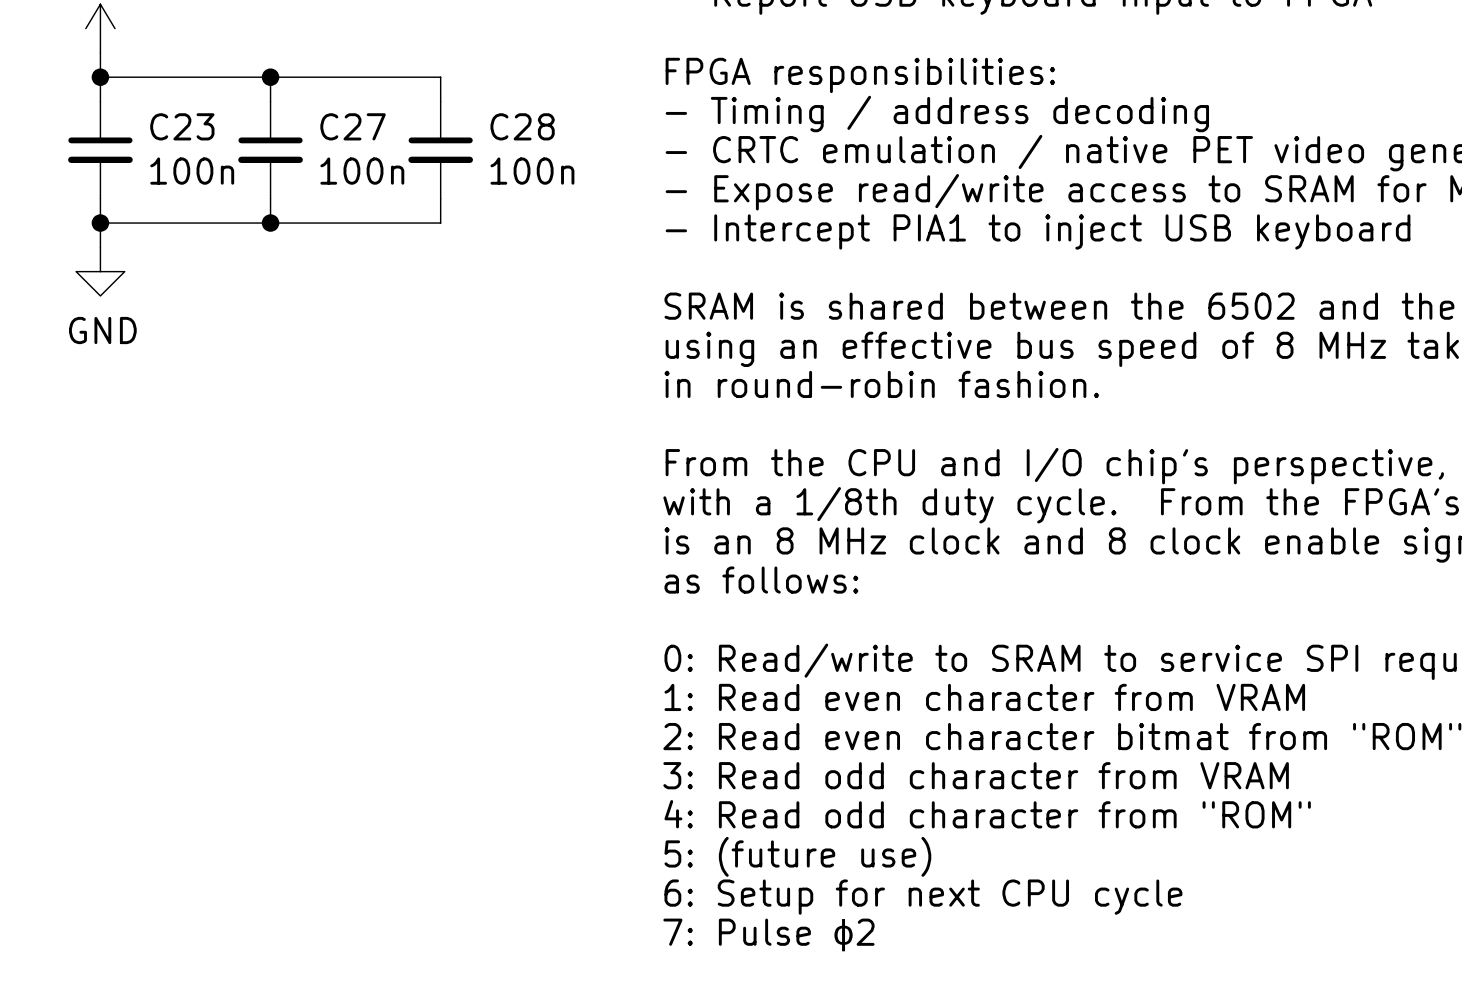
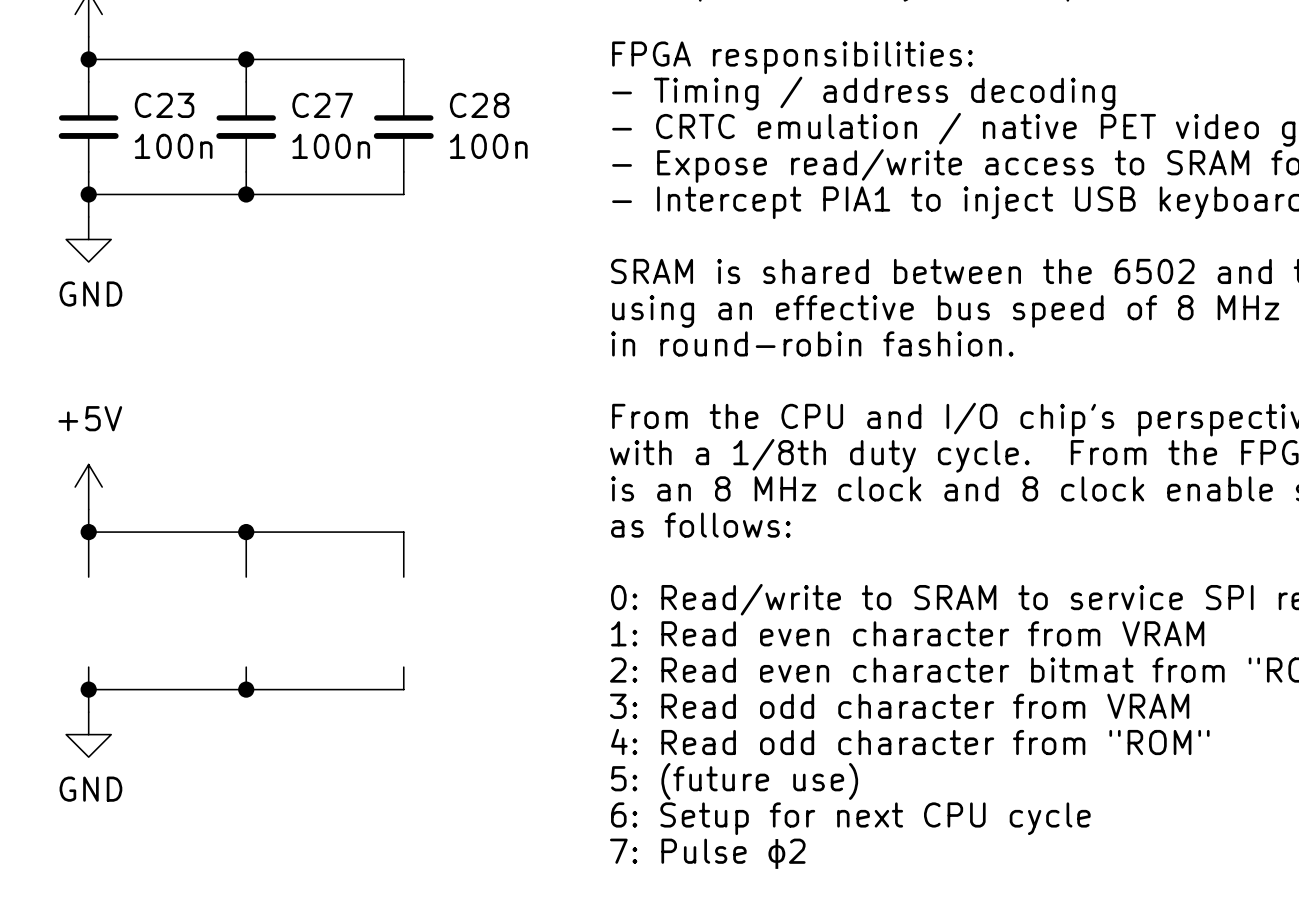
power symbol: none -> +5V (88, 487)
wire: none -> (88, 509) (88, 577)
wire: none -> (88, 532) (403, 532) (403, 577)
junction: none -> (88, 532)
wire: none -> (246, 532) (246, 577)
junction: none -> (246, 532)
wire: none -> (88, 667) (88, 712)
wire: none -> (246, 667) (246, 689)
wire: none -> (403, 667) (403, 689) (88, 689)
junction: none -> (88, 689)
junction: none -> (246, 689)
power symbol: none -> GND (88, 734)

